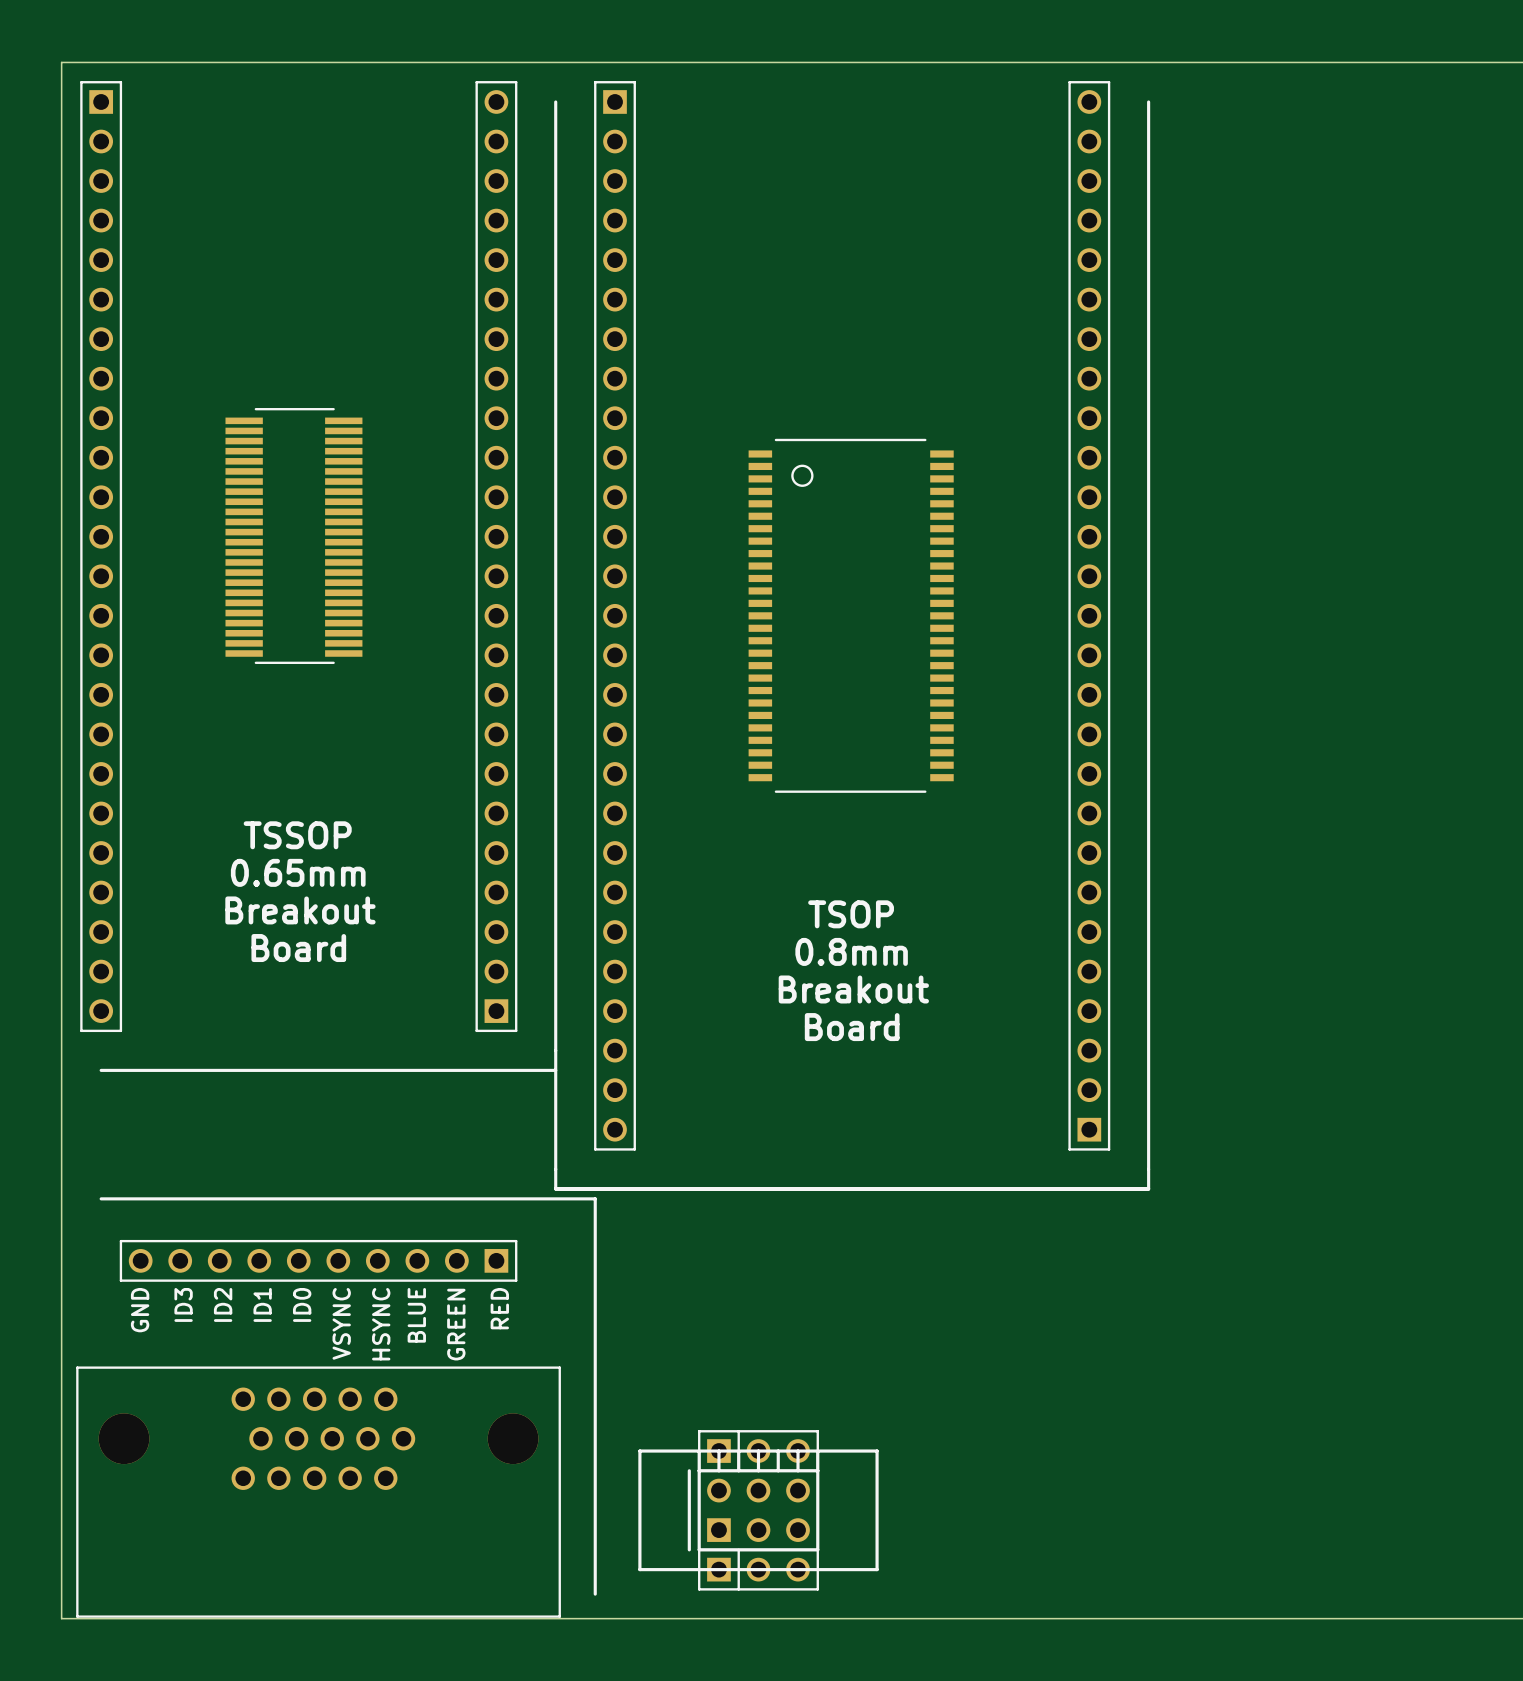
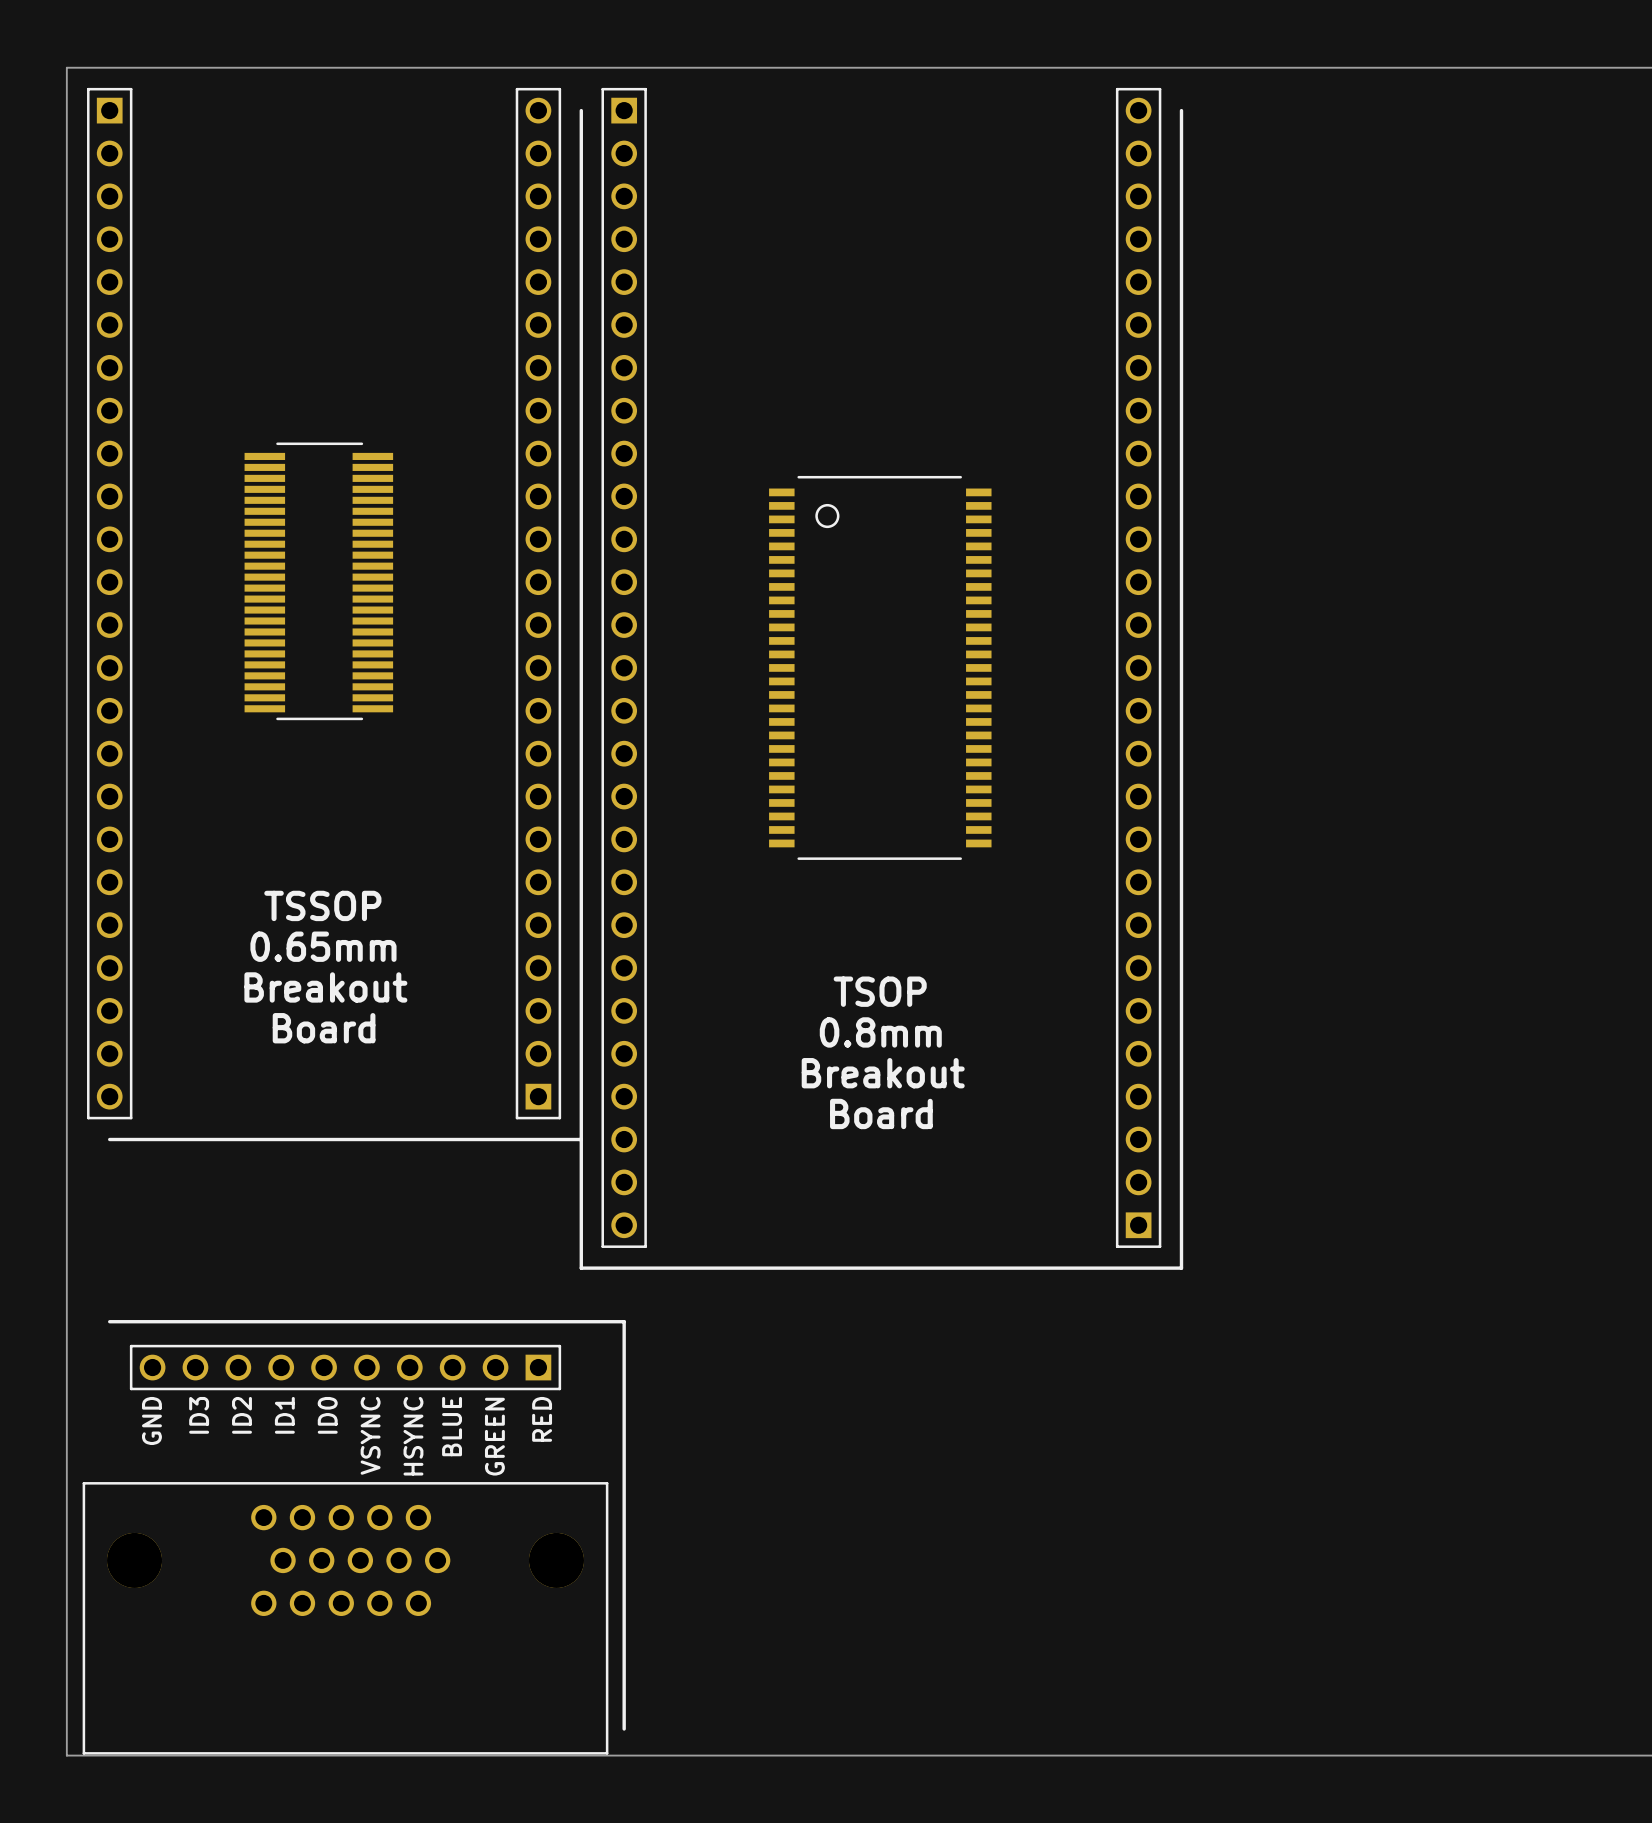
line: none -> (581, 110) (581, 1268) (1181, 1268) (1181, 110)
line: (555, 101) (555, 1188) (1148, 1188) (1148, 101) -> none
part position: (615, 615) -> (624, 667)
part position: (851, 615) -> (880, 667)
part position: (1089, 615) -> (1138, 667)
text position: TSOP (851, 914) -> TSOP (880, 991)
text position: 0.8mm (851, 951) -> 0.8mm (880, 1032)
text position: Breakout (853, 989) -> Breakout (883, 1073)
text position: Board (852, 1027) -> Board (881, 1113)
line: none -> (109, 1139) (581, 1139)
line: (101, 1070) (555, 1070) -> none
line: (101, 1198) (595, 1198) (595, 1594) -> none
line: none -> (109, 1321) (624, 1321) (624, 1728)
part: (758, 1451) -> none
part: (758, 1510) -> none
part: (758, 1569) -> none

